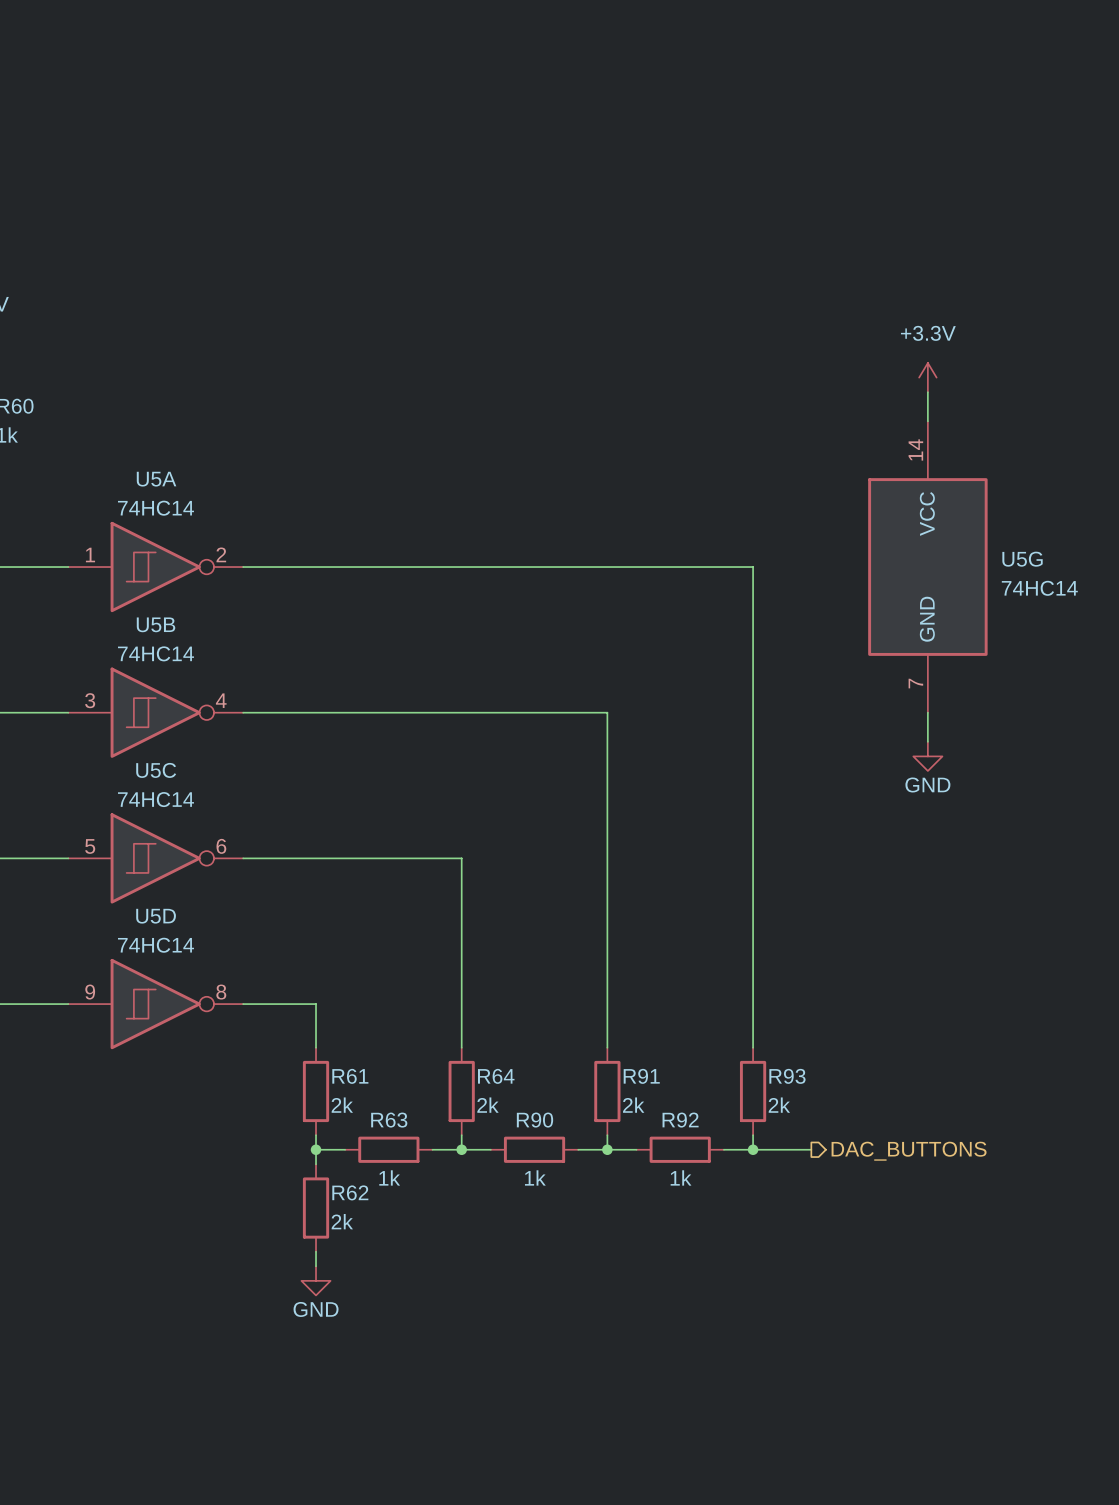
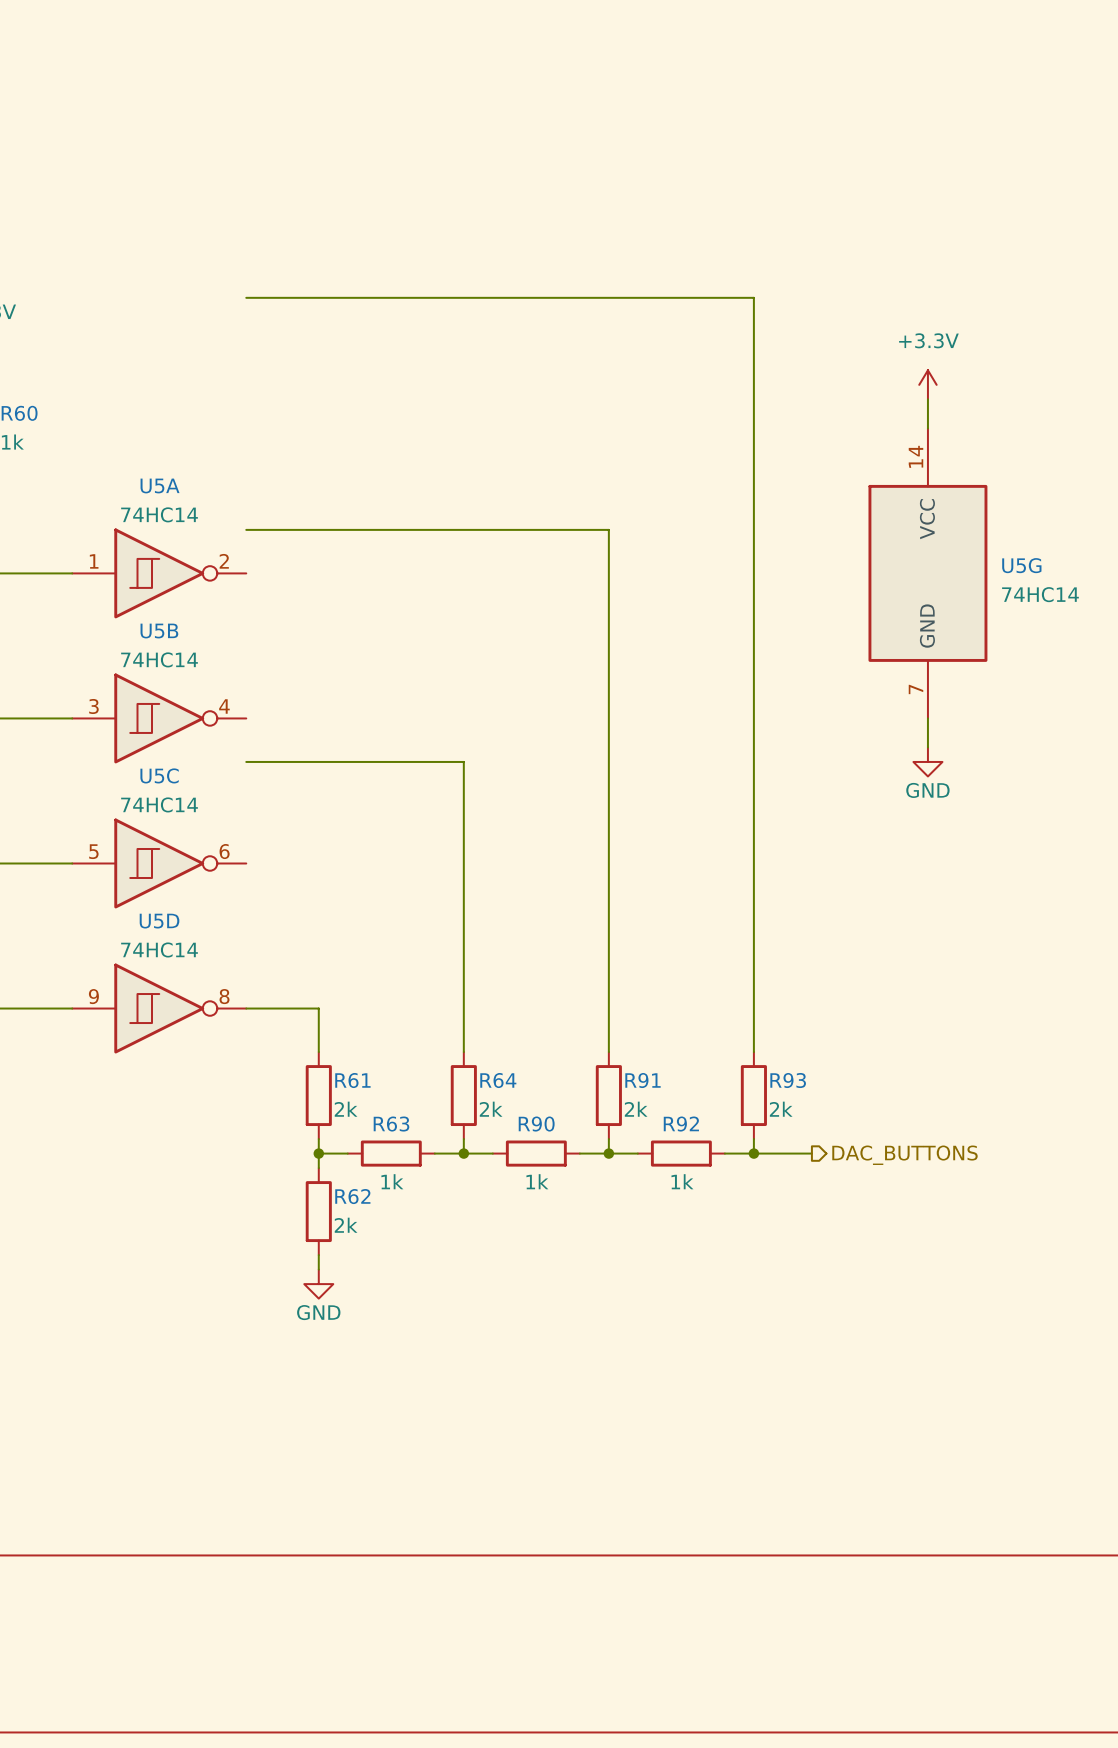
wire: (243, 567) (753, 567) -> (246, 297) (753, 297) (753, 573)
wire: (243, 712) (607, 712) -> (246, 529) (608, 529) (608, 718)
wire: (243, 858) (461, 858) -> (246, 761) (463, 761) (463, 863)

